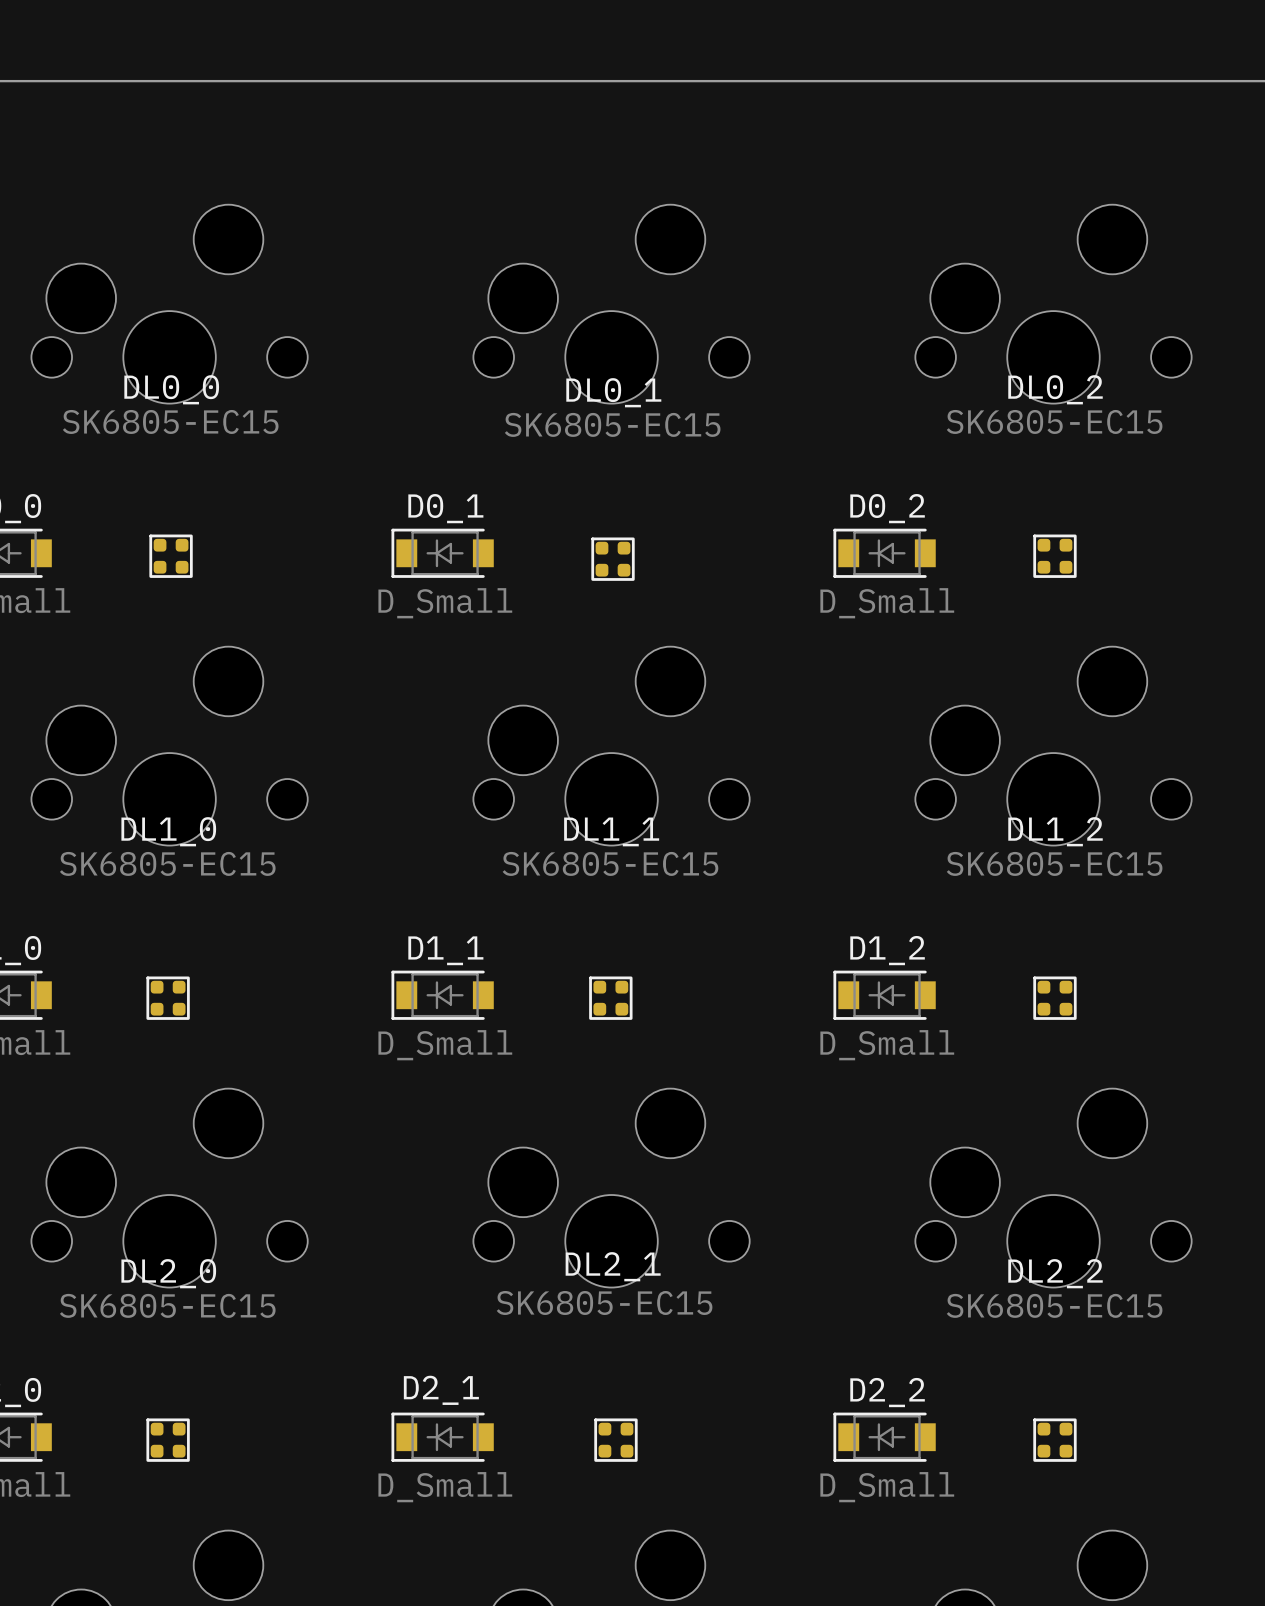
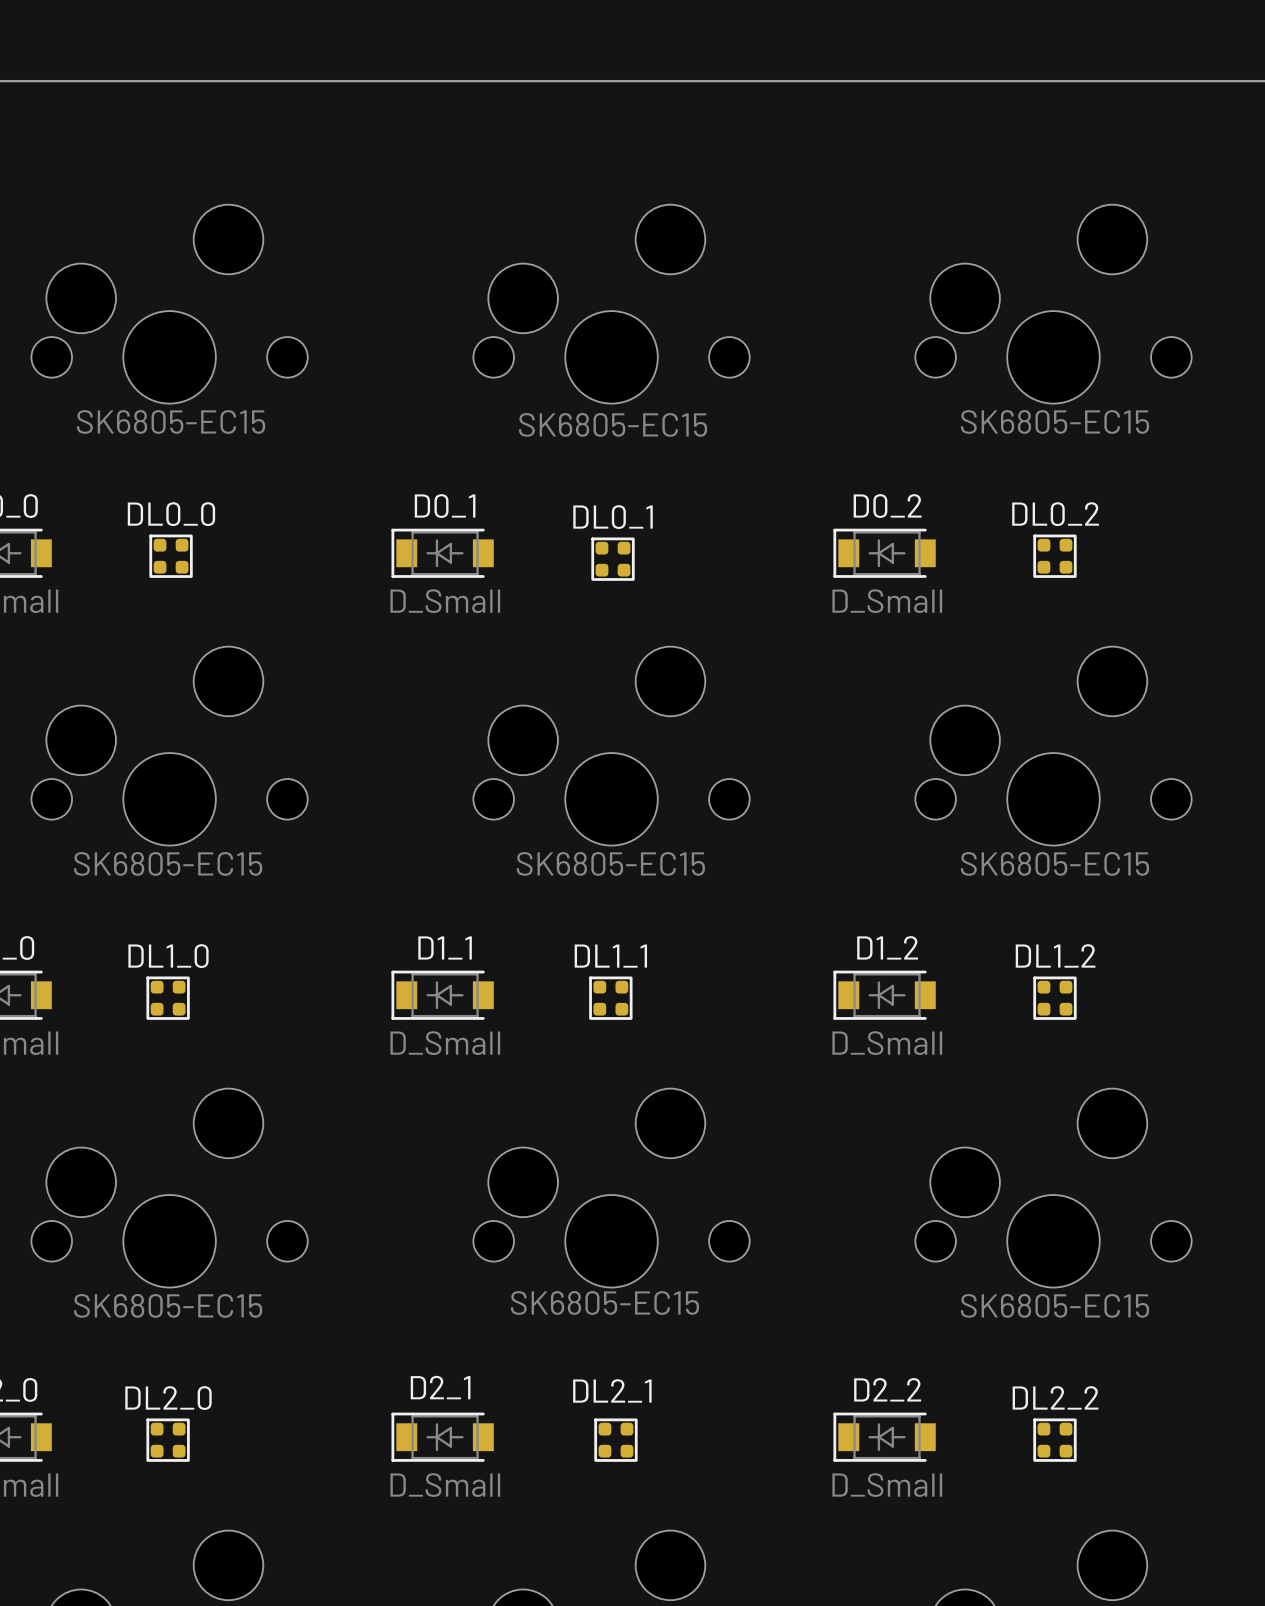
DL0_0 name position: DL0_0 (171, 389) -> DL0_0 (171, 514)
DL0_2 name position: DL0_2 (1055, 389) -> DL0_2 (1055, 514)
DL0_1 name position: DL0_1 (613, 392) -> DL0_1 (613, 517)
DL1_0 name position: DL1_0 (168, 831) -> DL1_0 (168, 956)
DL1_1 name position: DL1_1 (611, 831) -> DL1_1 (610, 956)
DL1_2 name position: DL1_2 (1055, 831) -> DL1_2 (1055, 955)
DL2_1 name position: DL2_1 (613, 1266) -> DL2_1 (612, 1390)
DL2_0 name position: DL2_0 (168, 1273) -> DL2_0 (168, 1398)
DL2_2 name position: DL2_2 (1055, 1273) -> DL2_2 (1055, 1397)

